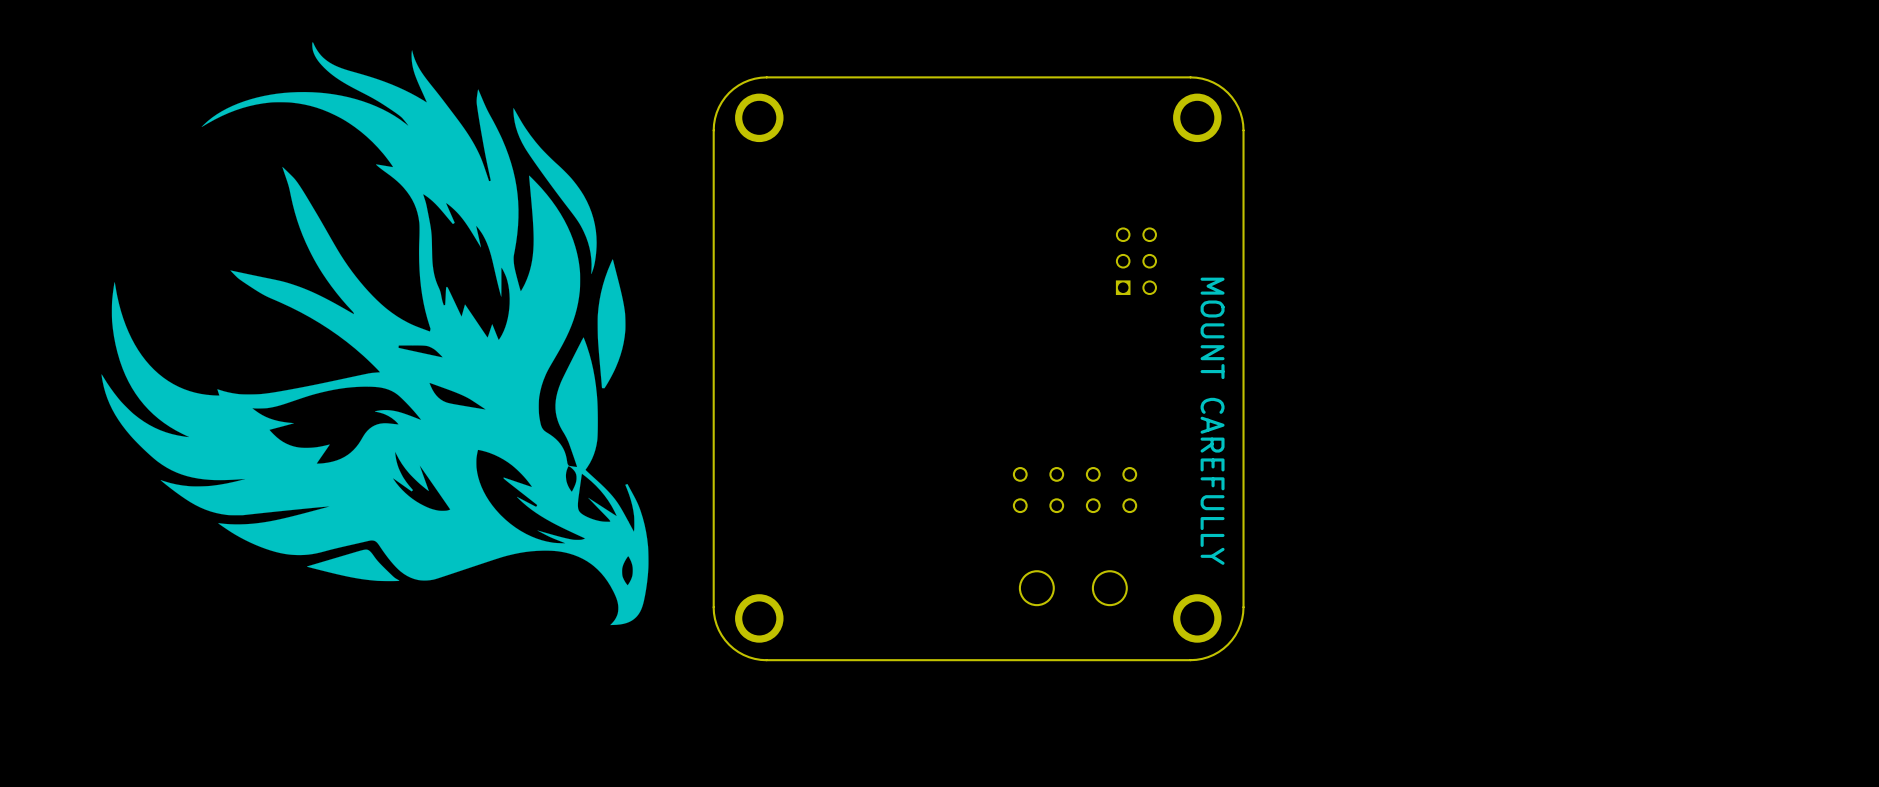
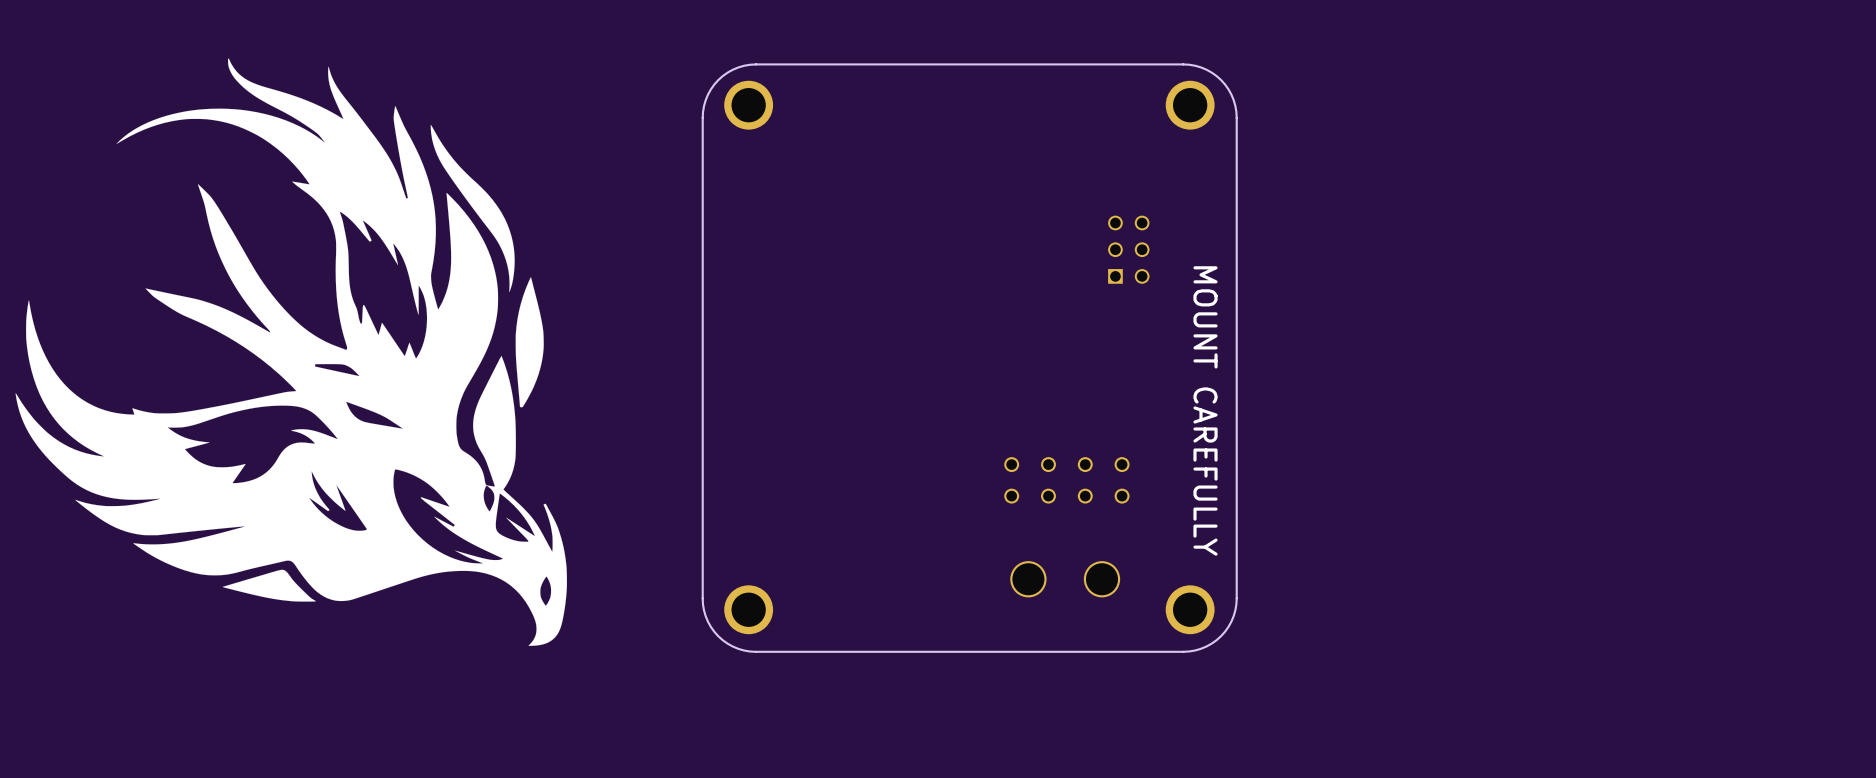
drawing position: (375, 333) -> (291, 352)

